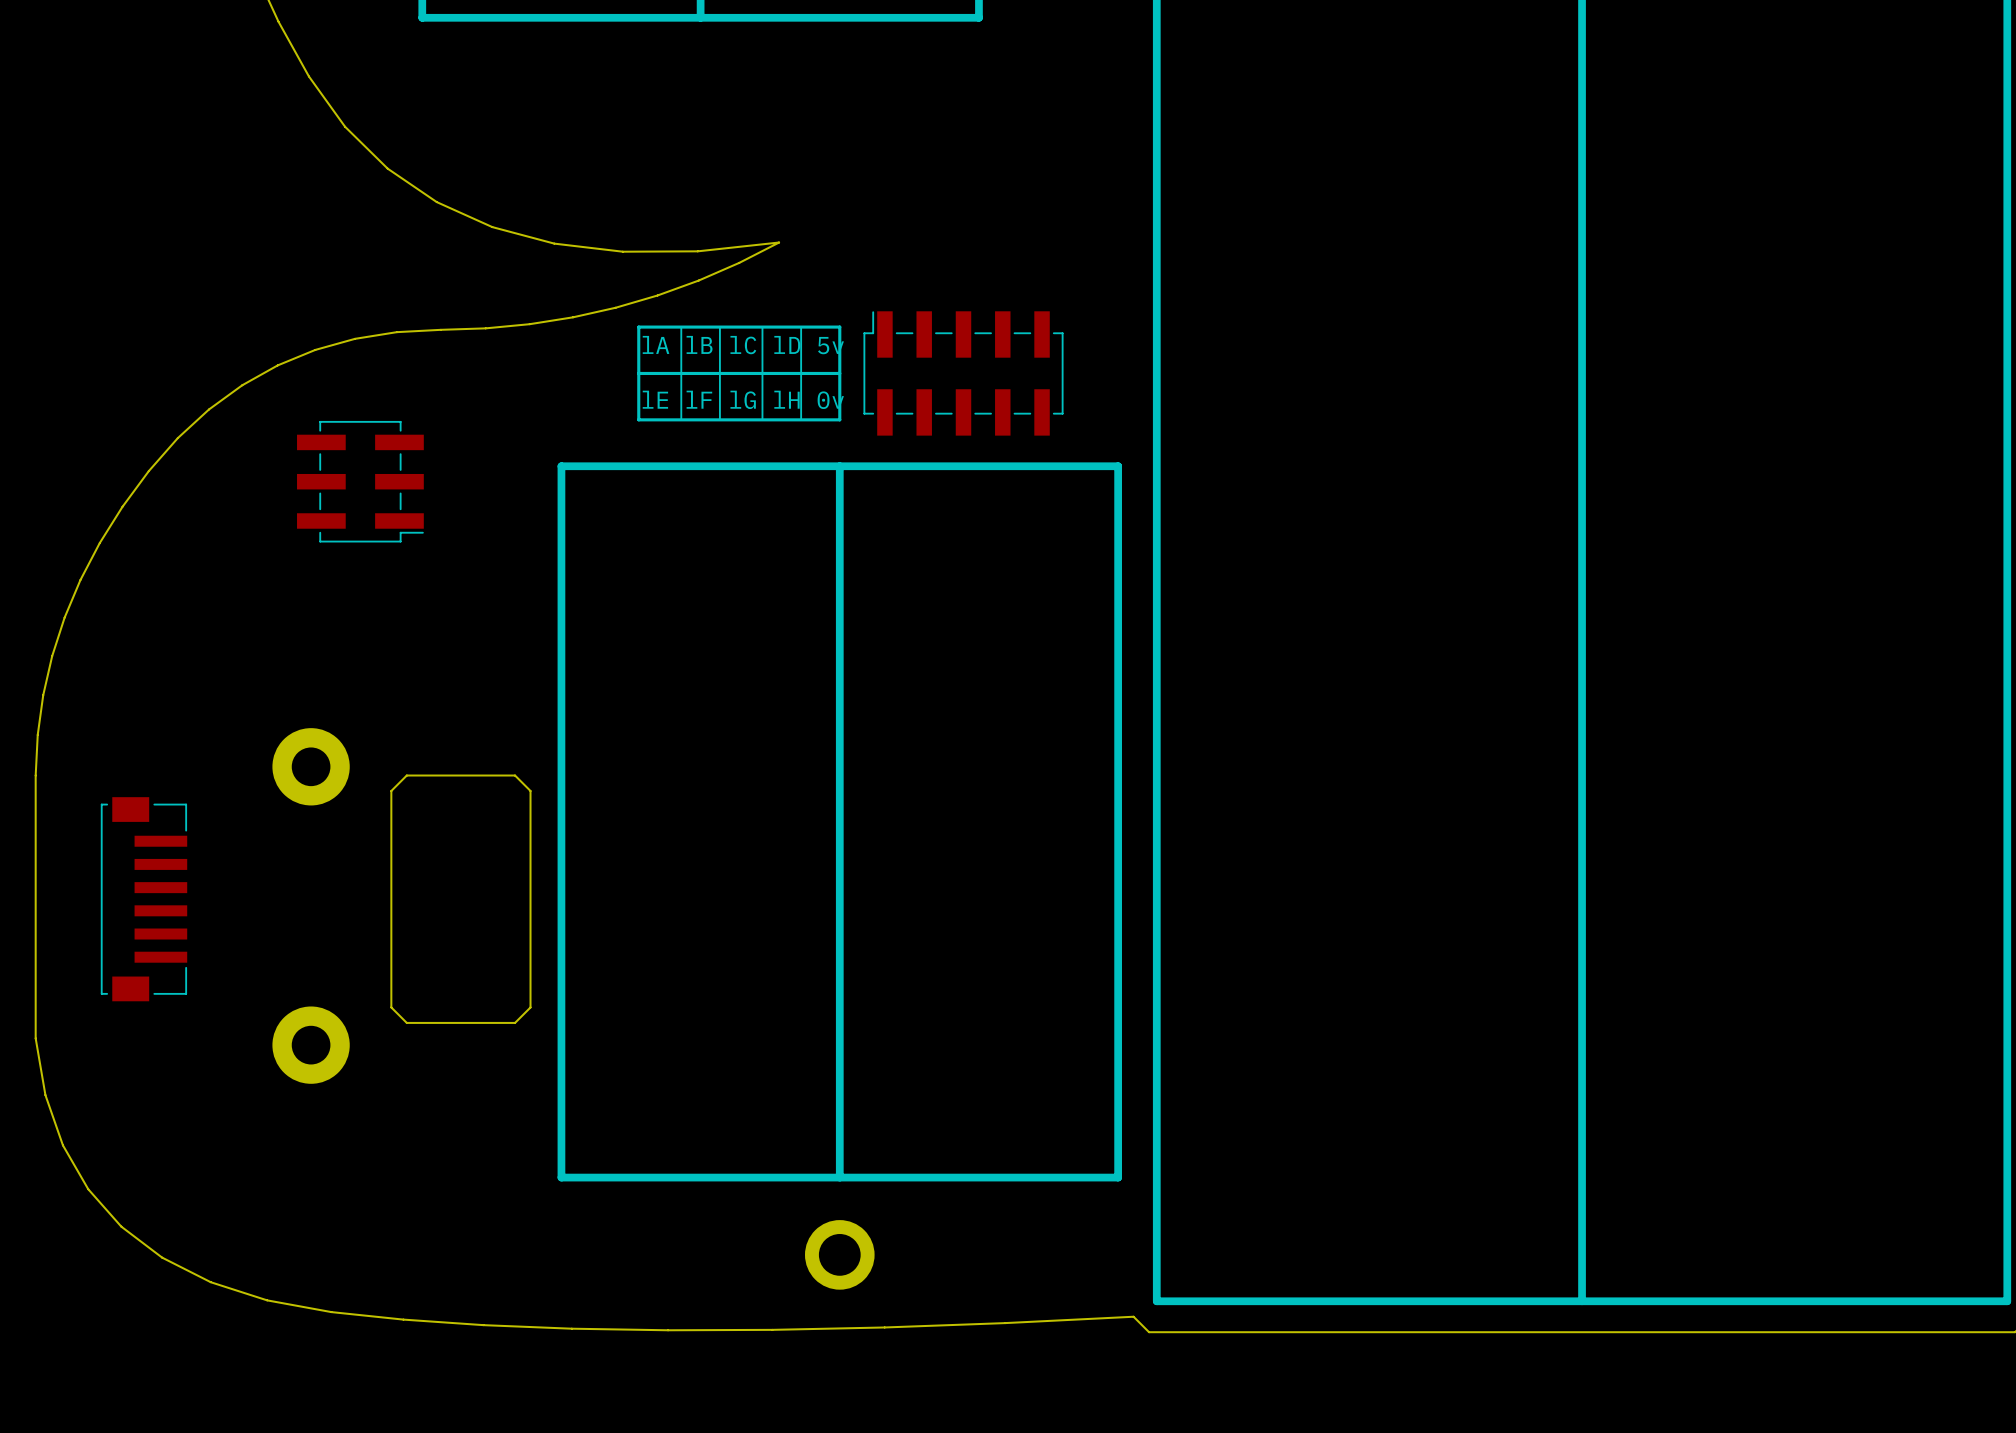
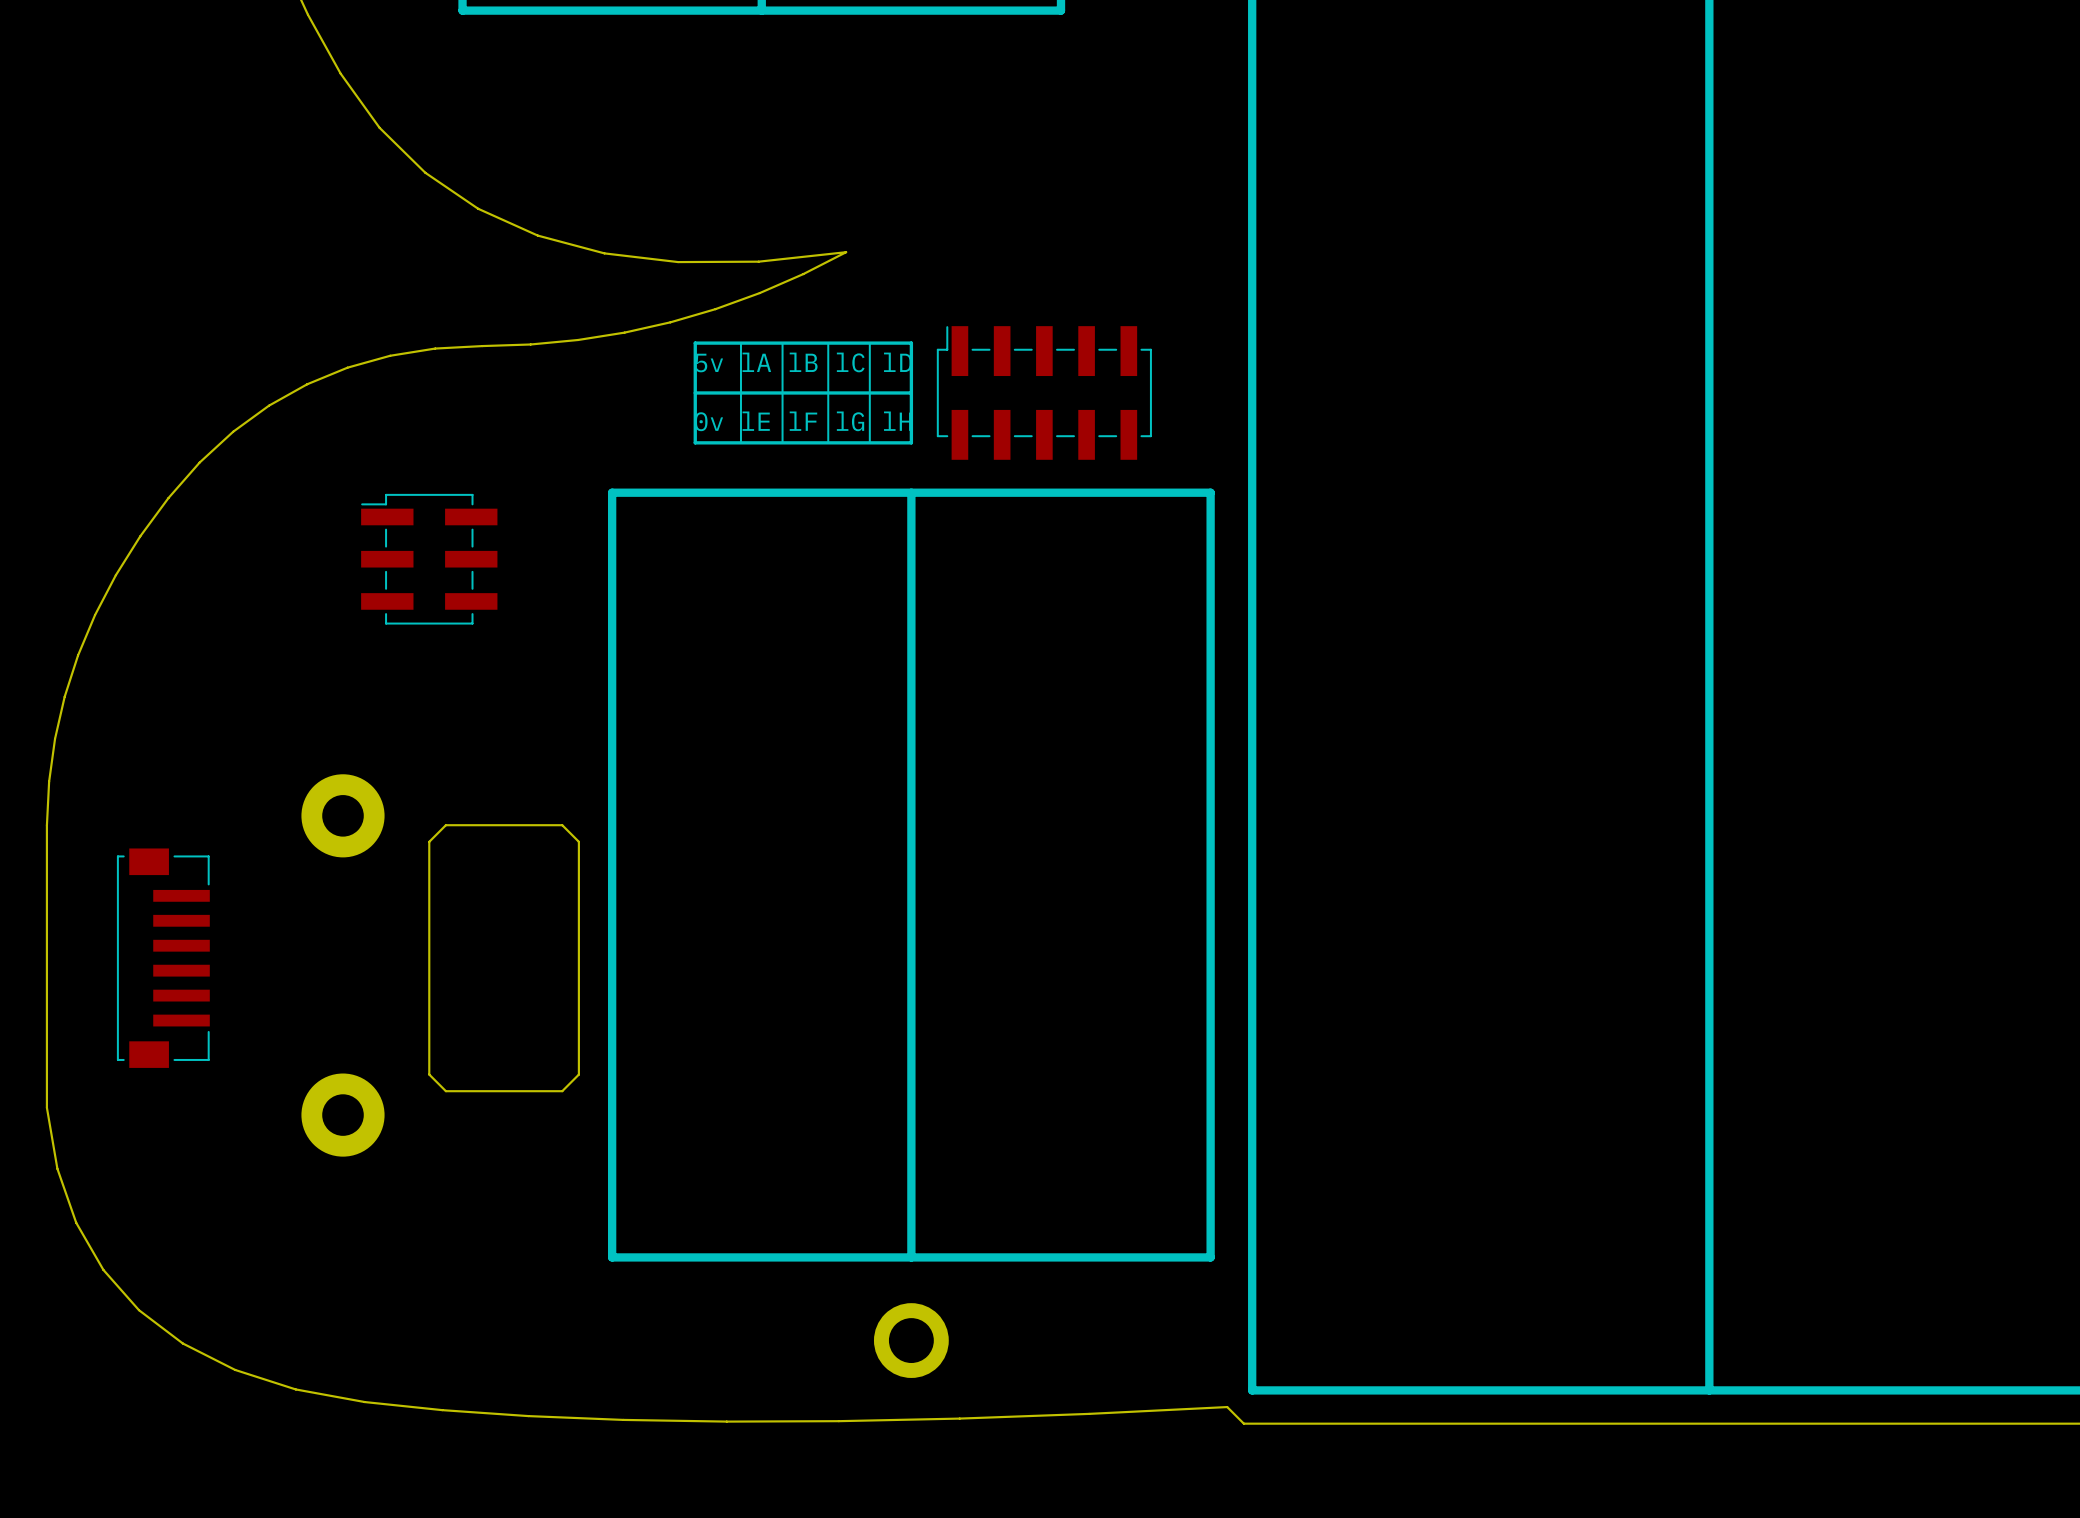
text: lA lB lC lD 5v (743, 345) -> 5v lA lB lC lD (803, 362)
text: lE lF lG lH 0v (743, 399) -> 0v lE lF lG lH (803, 421)
part rotation: 0° (360, 481) -> 180° (429, 559)

